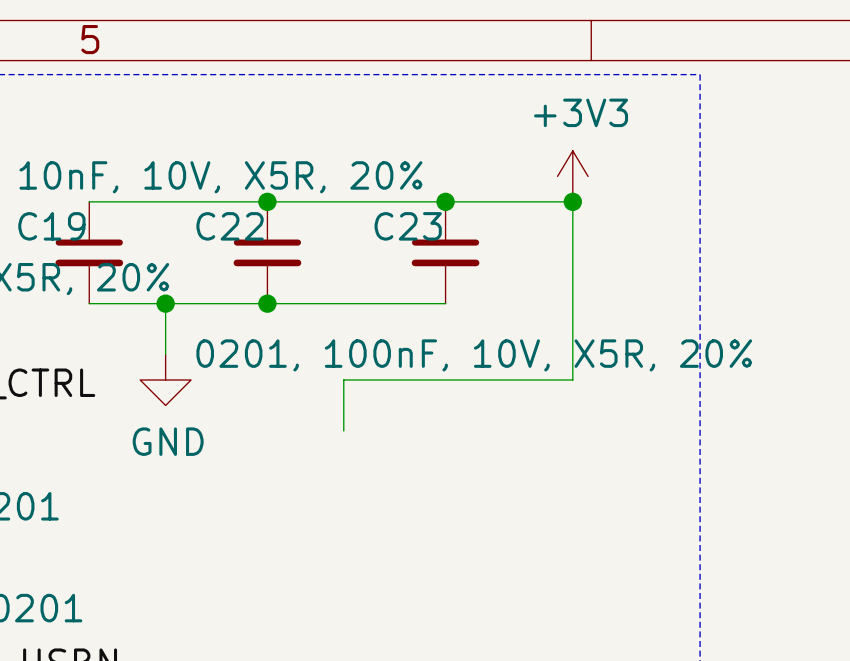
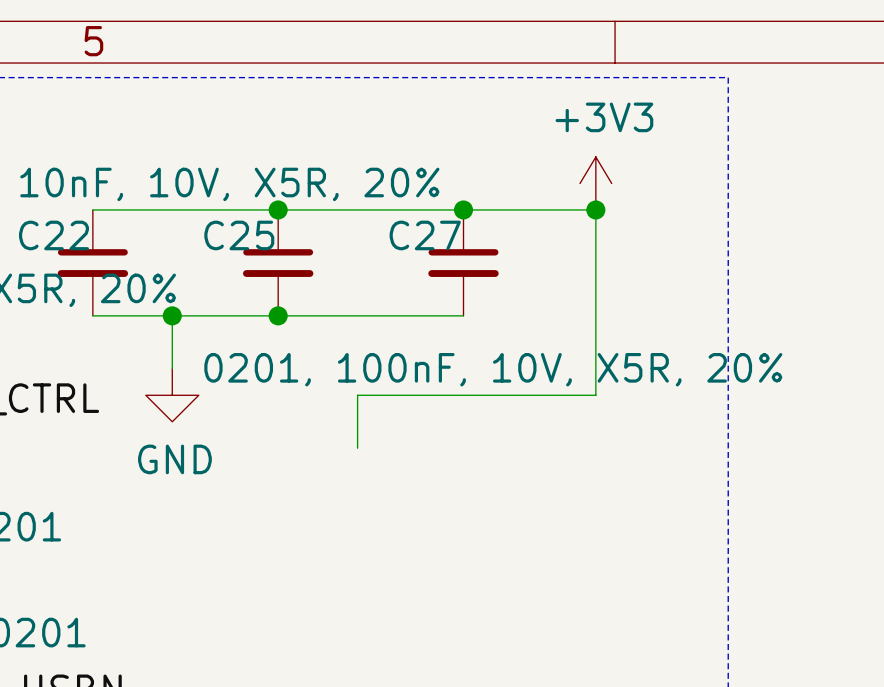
C19 name: C19 (51, 226) -> C22 (53, 235)
C22 name: C22 (230, 226) -> C25 (239, 235)
C23 name: C23 (408, 226) -> C27 (425, 235)

